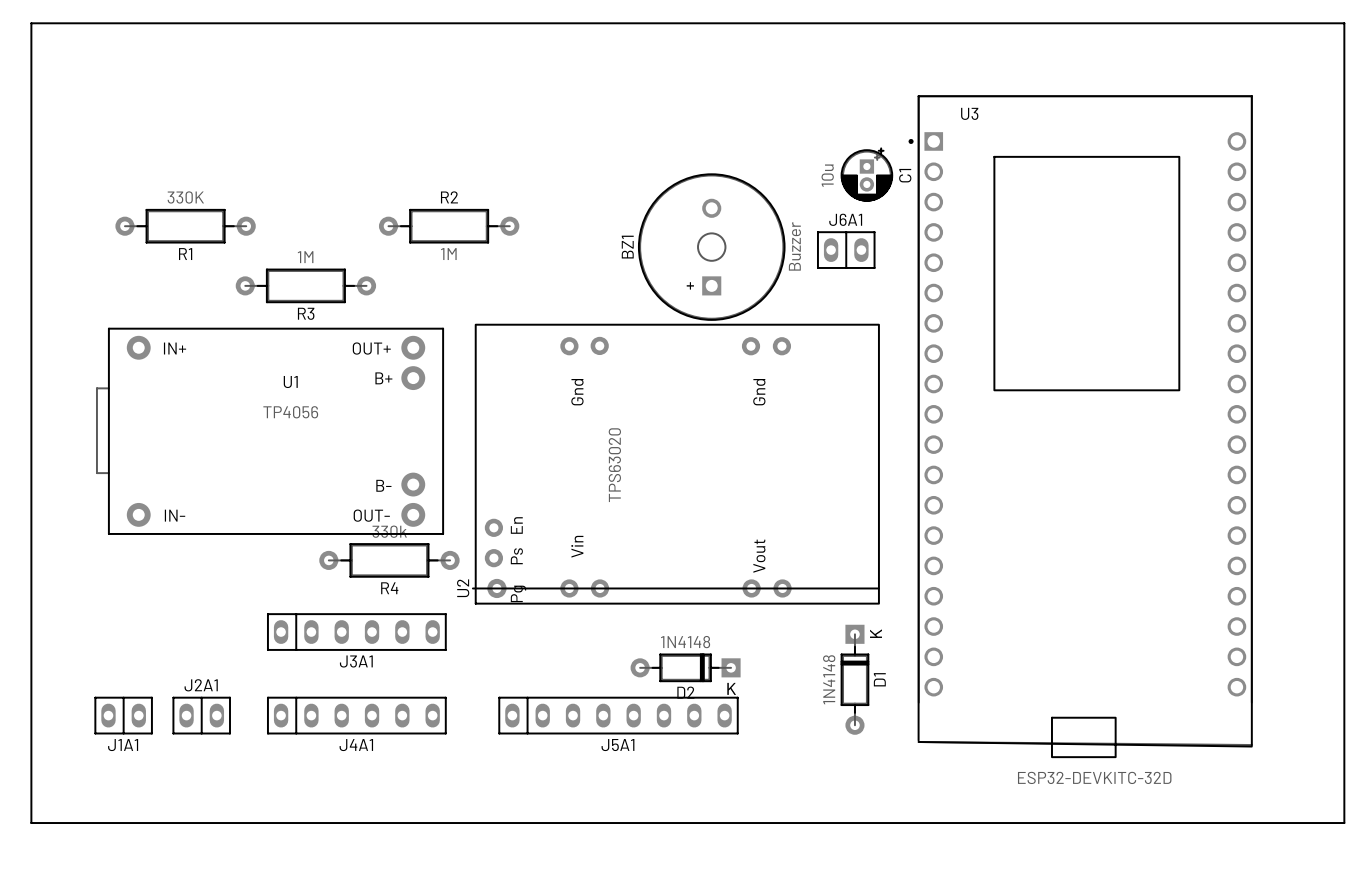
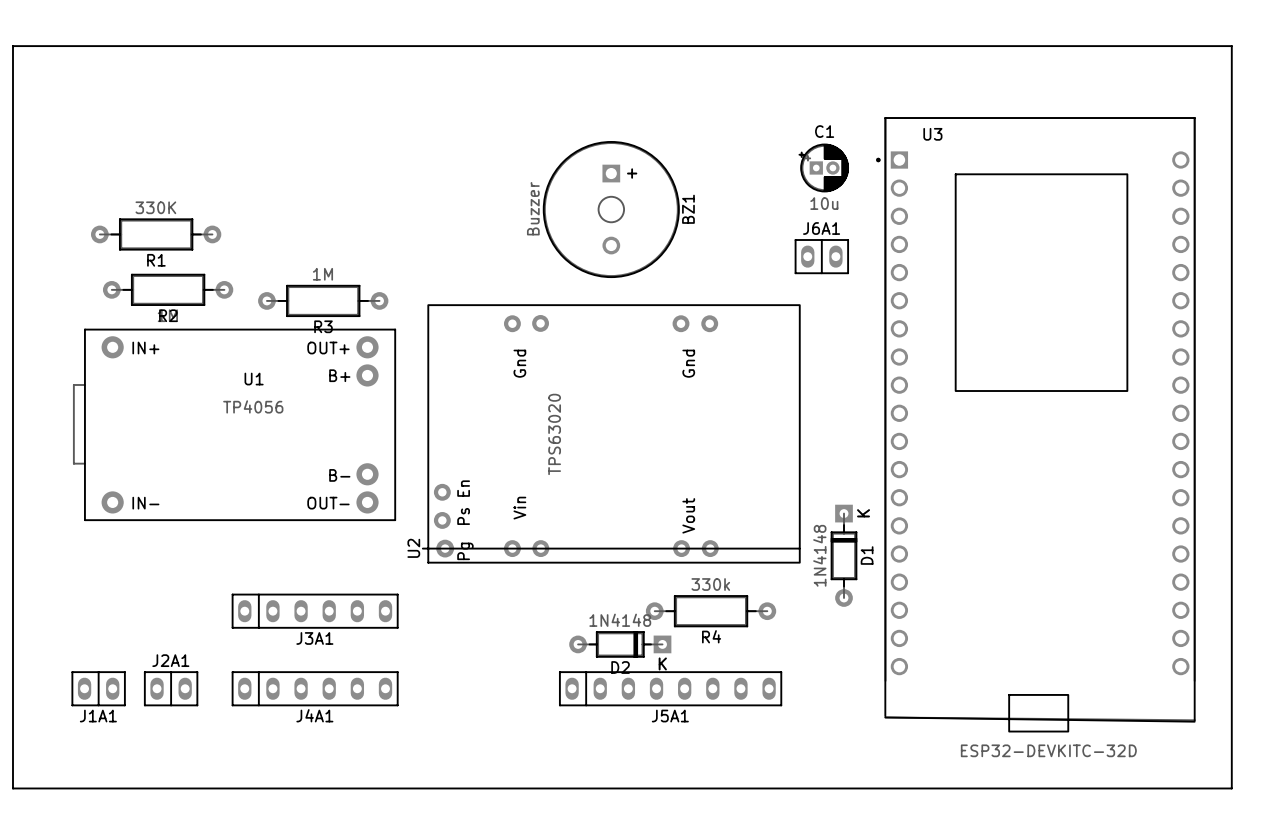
C1 rotation: 0° (866, 174) -> 90° counterclockwise (823, 167)
C1 position: (866, 174) -> (823, 167)
R2 name position: R2 (449, 197) -> R2 (168, 315)
R2 position: (449, 226) -> (168, 289)
BZ1 rotation: 0° (711, 247) -> 180° (611, 209)
J6A1 position: (846, 250) -> (821, 256)
R3 position: (305, 285) -> (323, 300)
U2 footprint: [472, 324, 880, 605] -> [422, 304, 801, 563]
U3 position: (1080, 426) -> (1035, 424)
R4 position: (389, 560) -> (711, 611)
D1 position: (854, 679) -> (844, 555)
J5A1 position: (618, 715) -> (670, 688)

